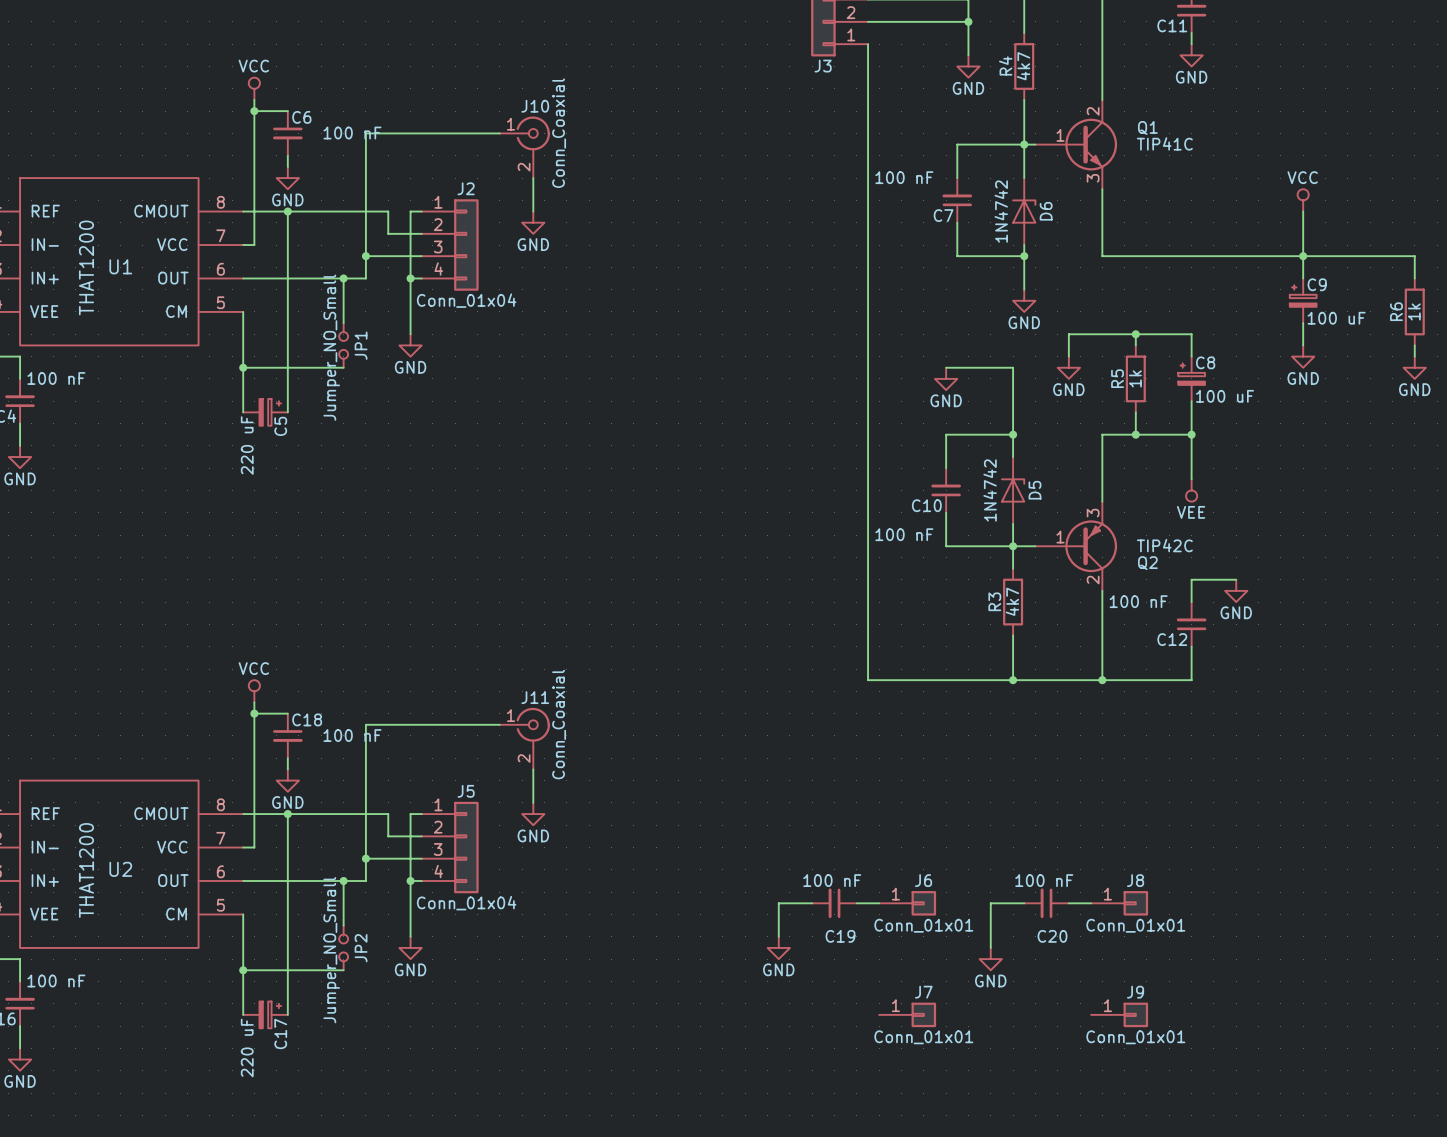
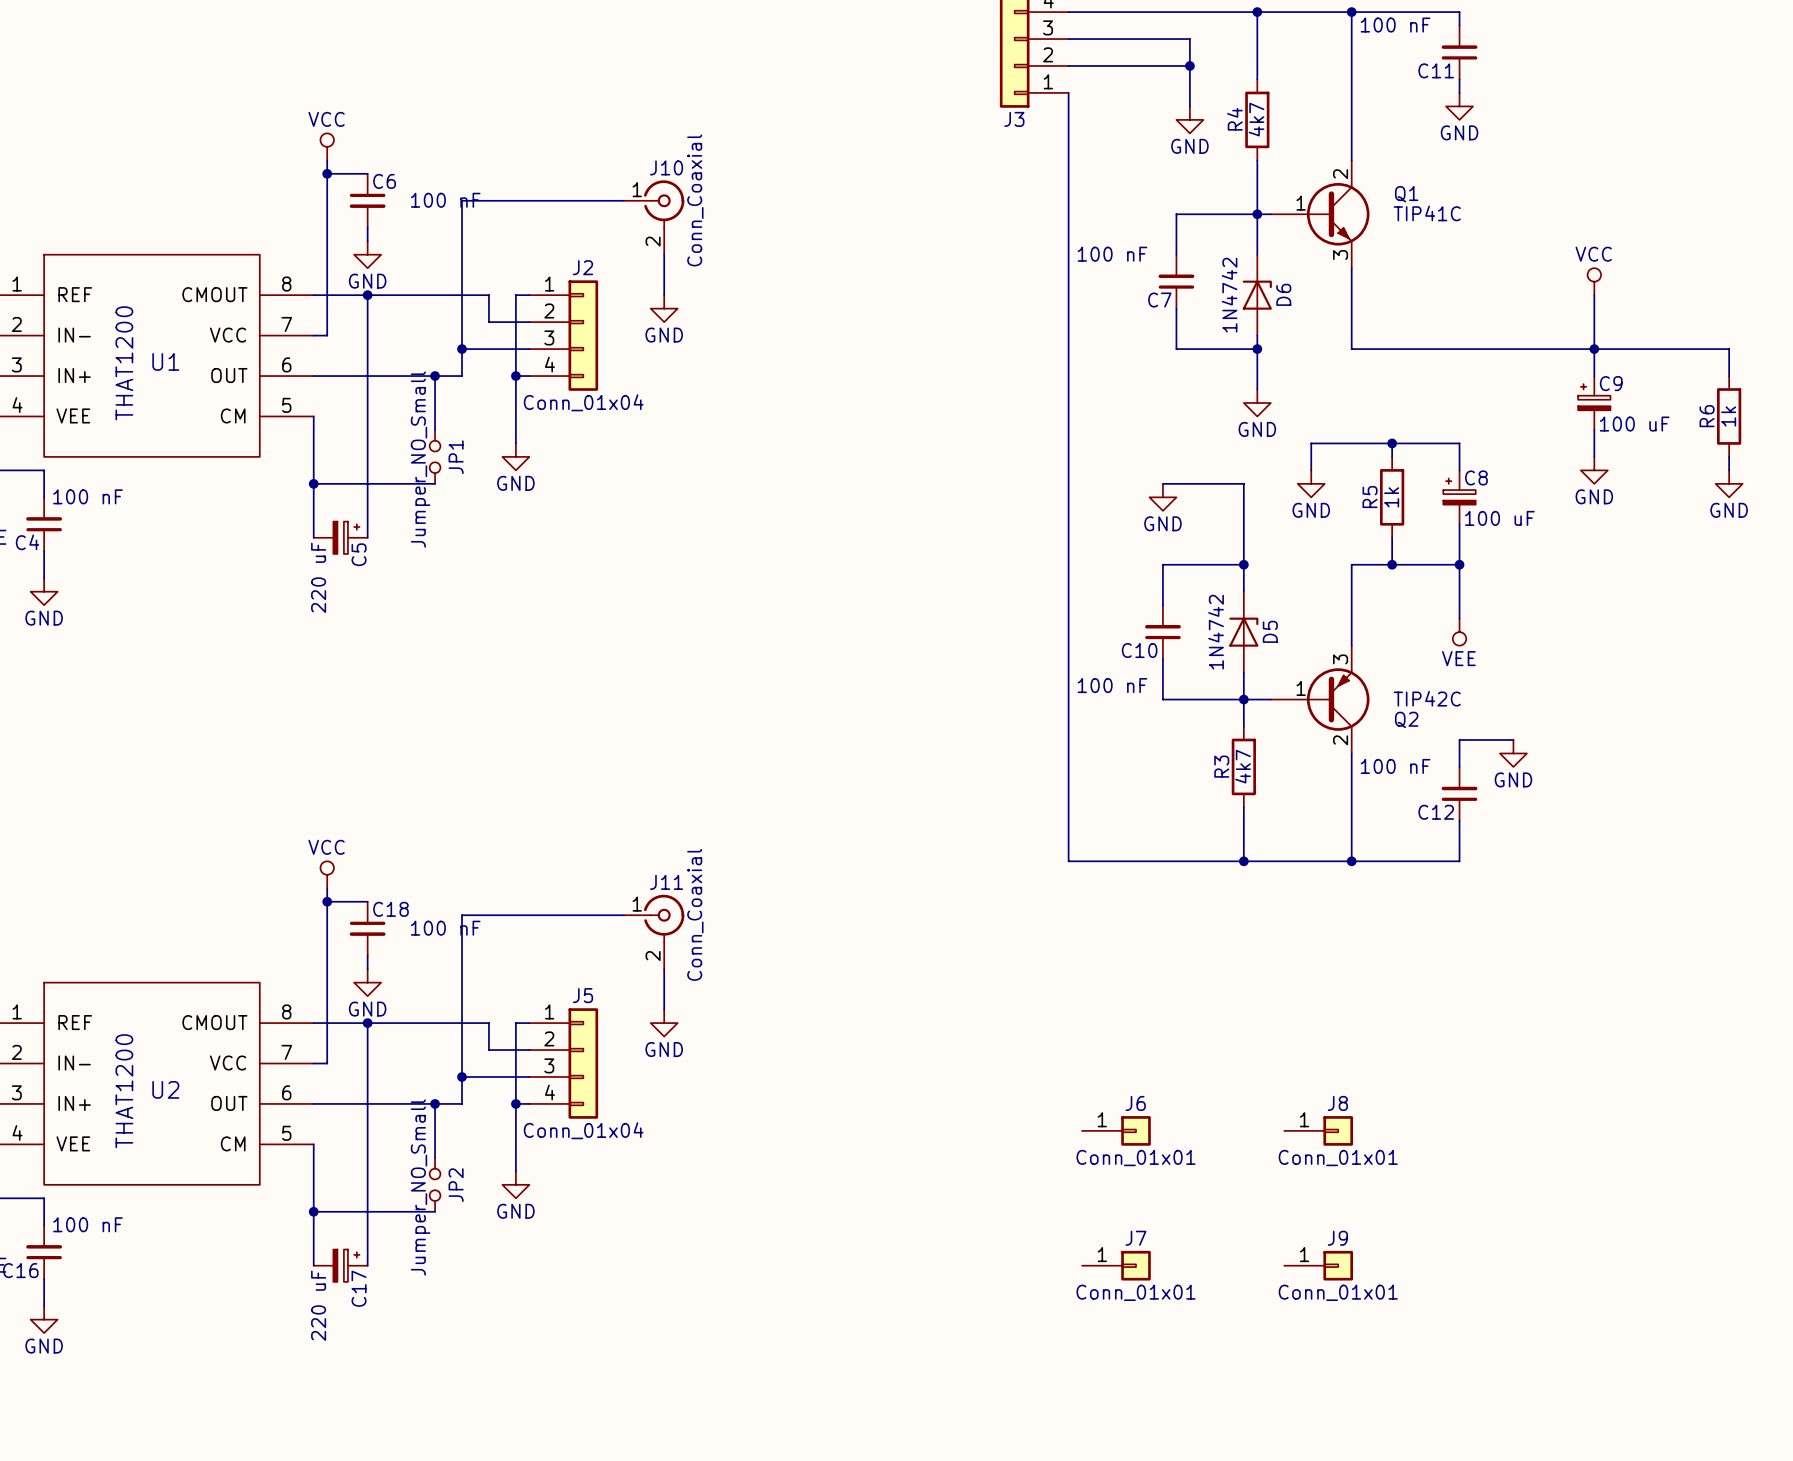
wire: (812, 903) (778, 903) (778, 936) -> none
C19: 100 nF (834, 903) -> none
wire: (856, 903) (879, 903) -> none
wire: (1024, 903) (990, 903) (990, 947) -> none
C20: 100 nF (1046, 903) -> none
J8 position: (1119, 903) -> (1318, 1130)
power symbol: GND (778, 947) -> none
power symbol: GND (990, 959) -> none
J9 position: (1119, 1014) -> (1318, 1265)

